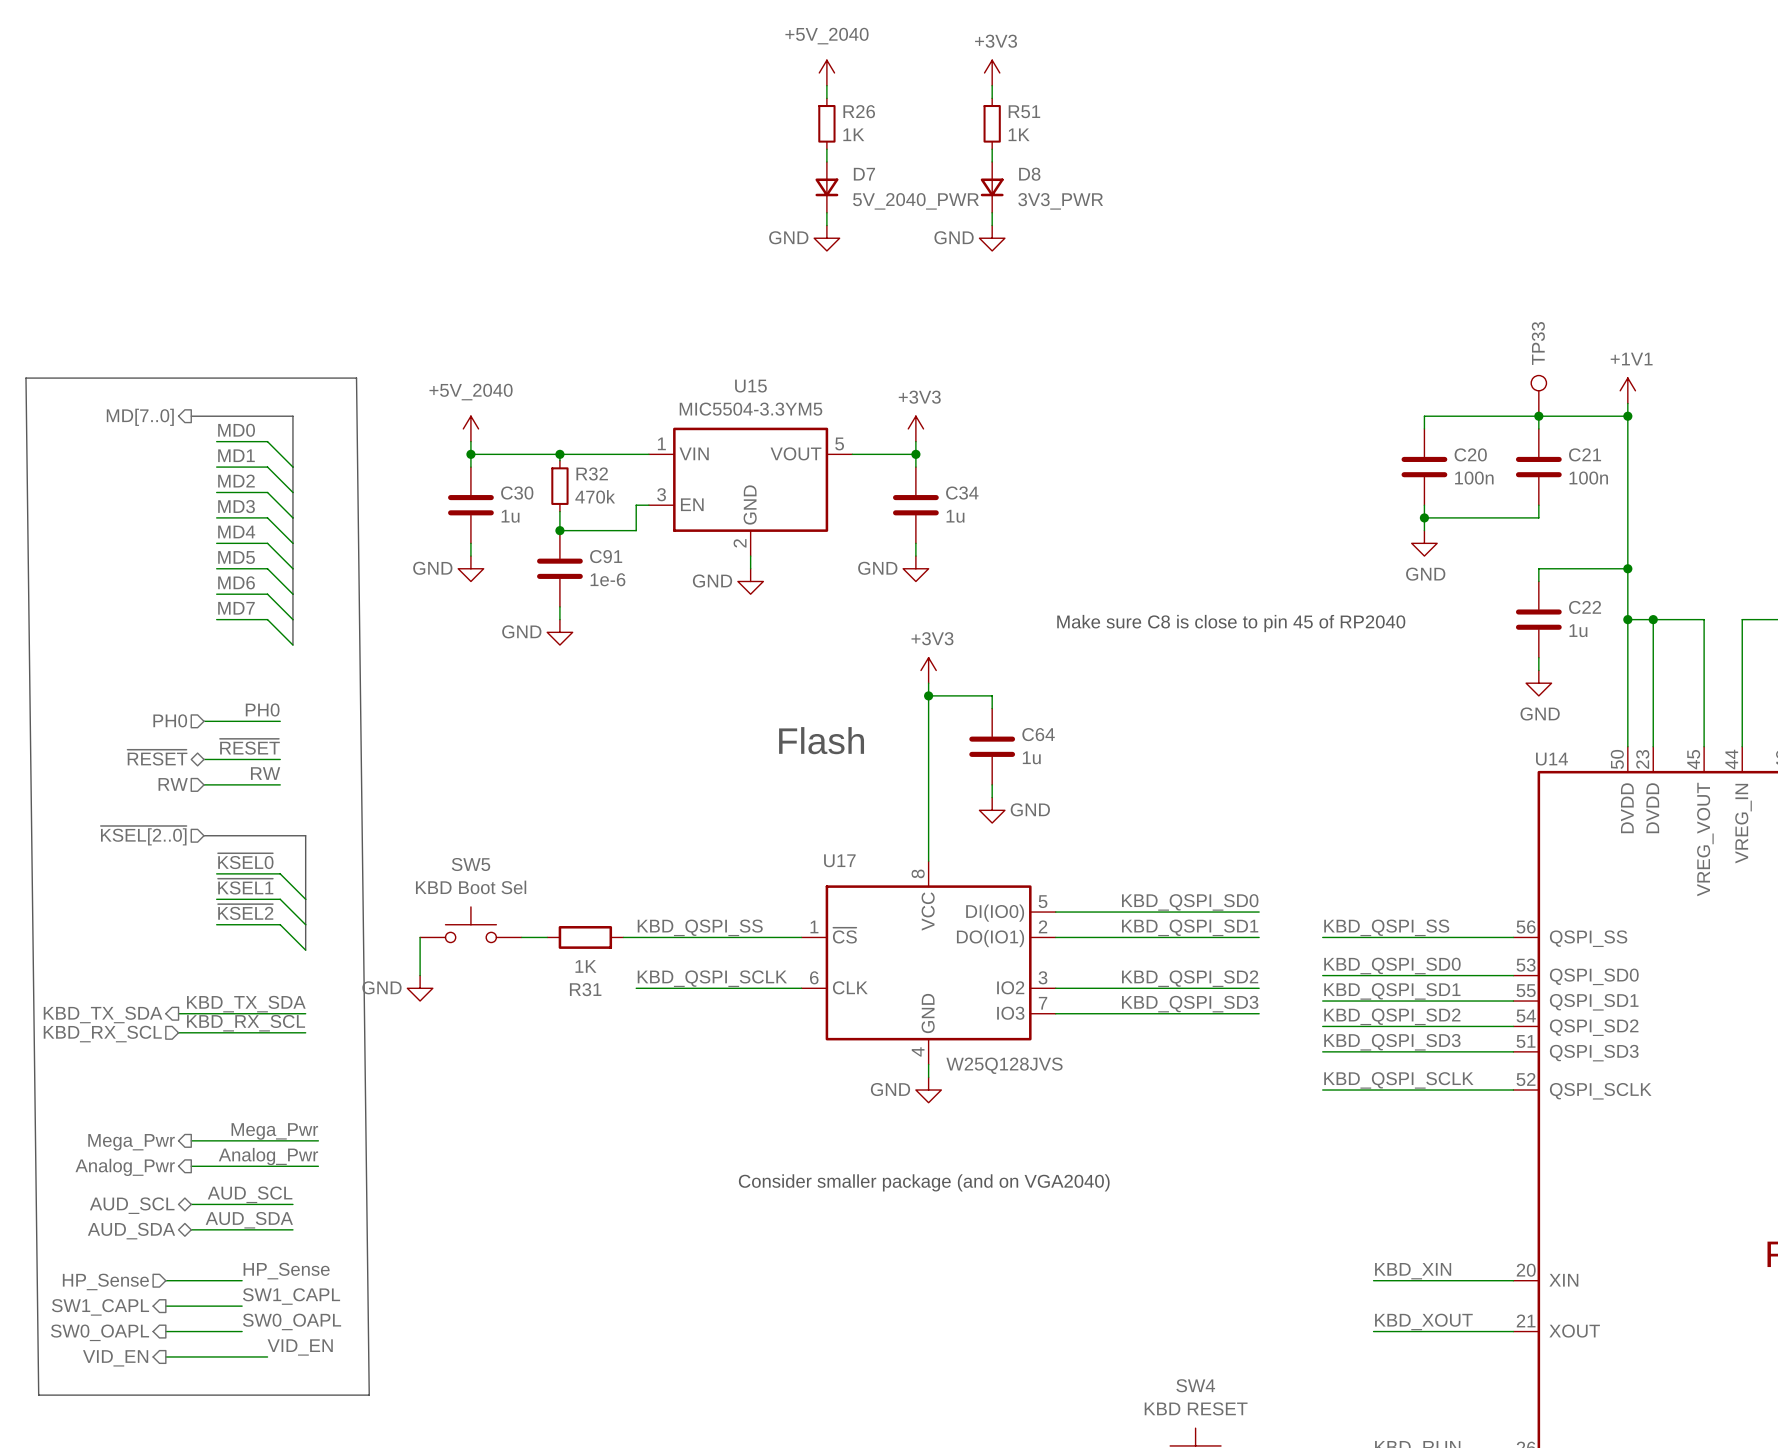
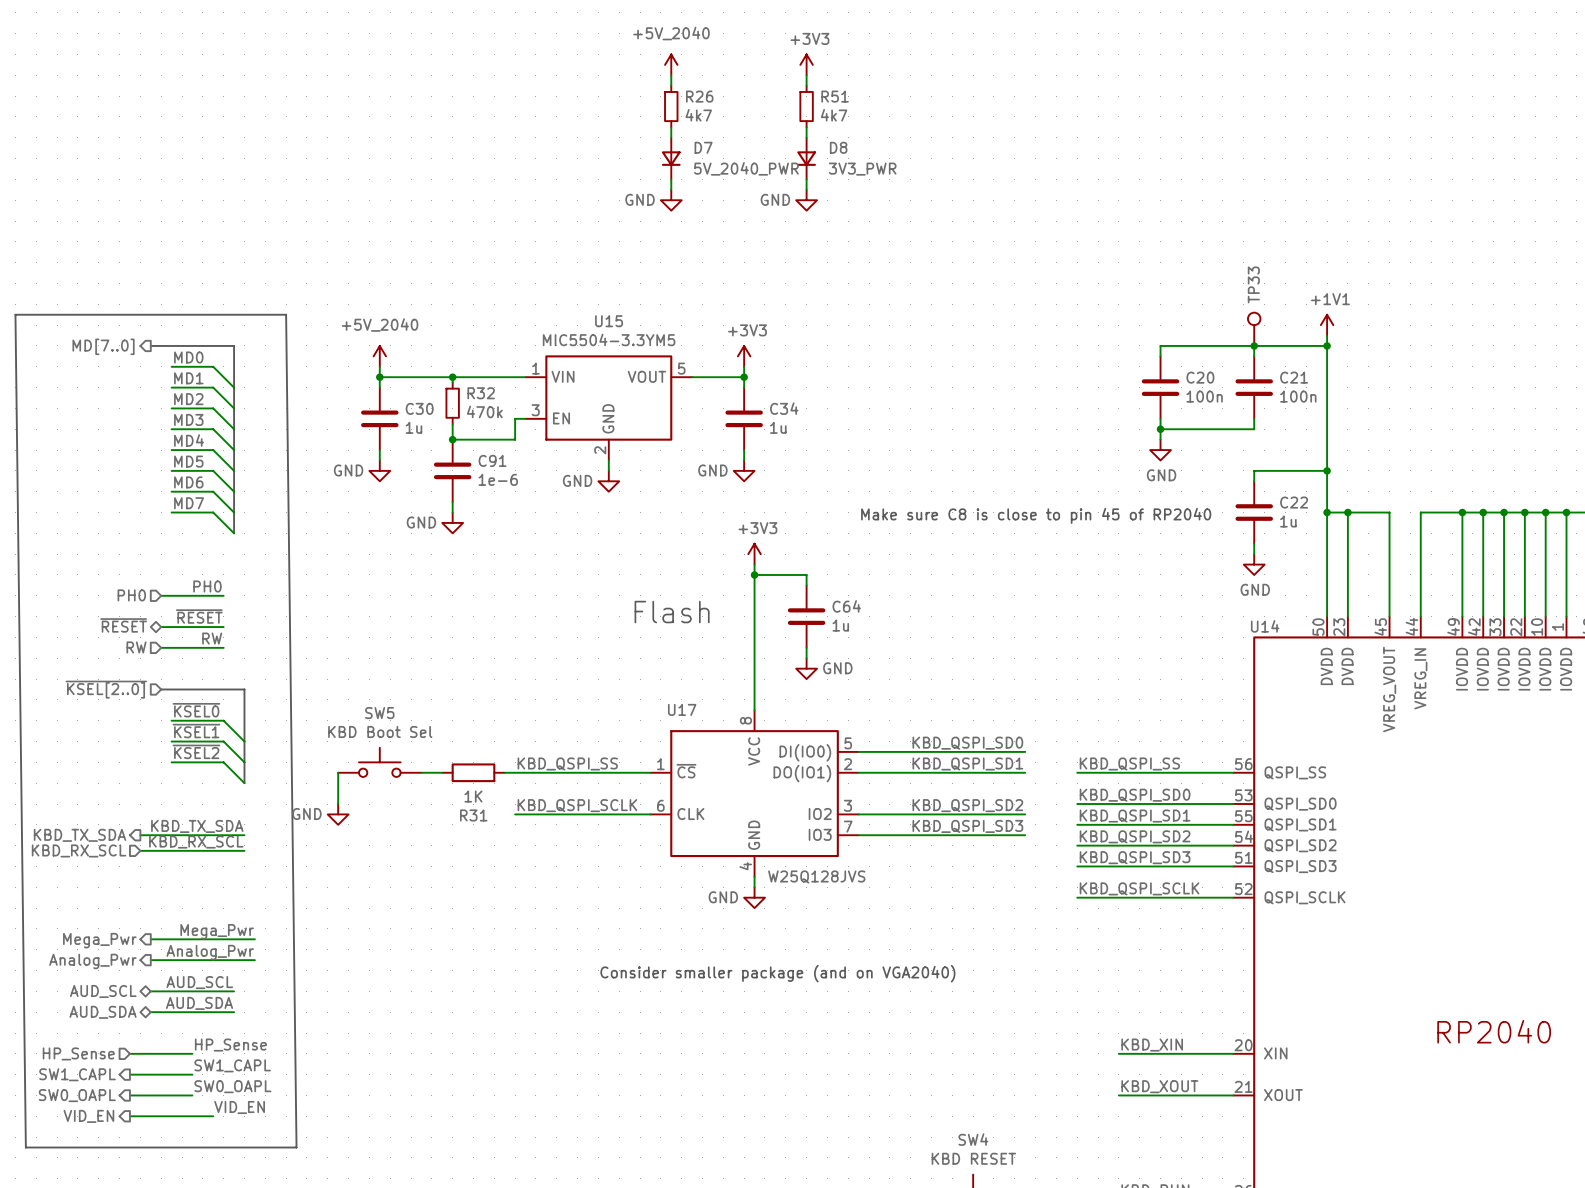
R26 value: 1K (853, 134) -> 4k7 (698, 115)
R51 value: 1K (1019, 134) -> 4k7 (834, 115)

